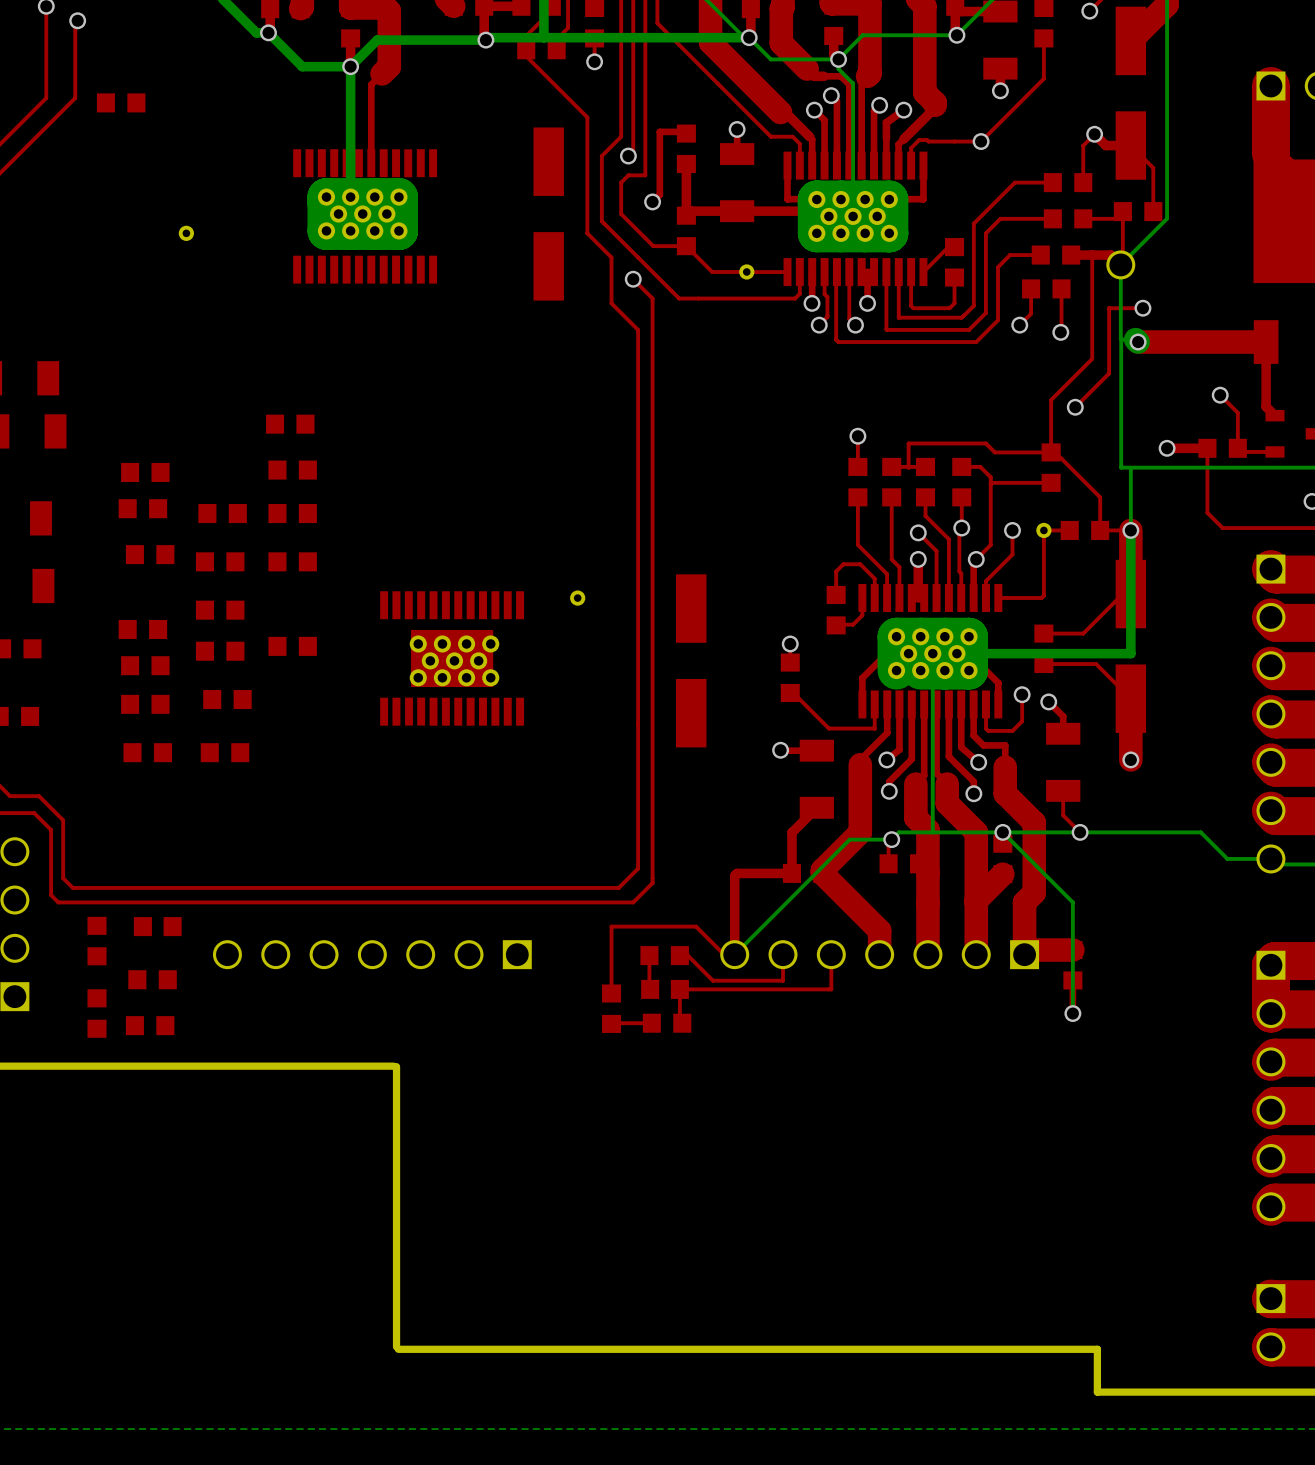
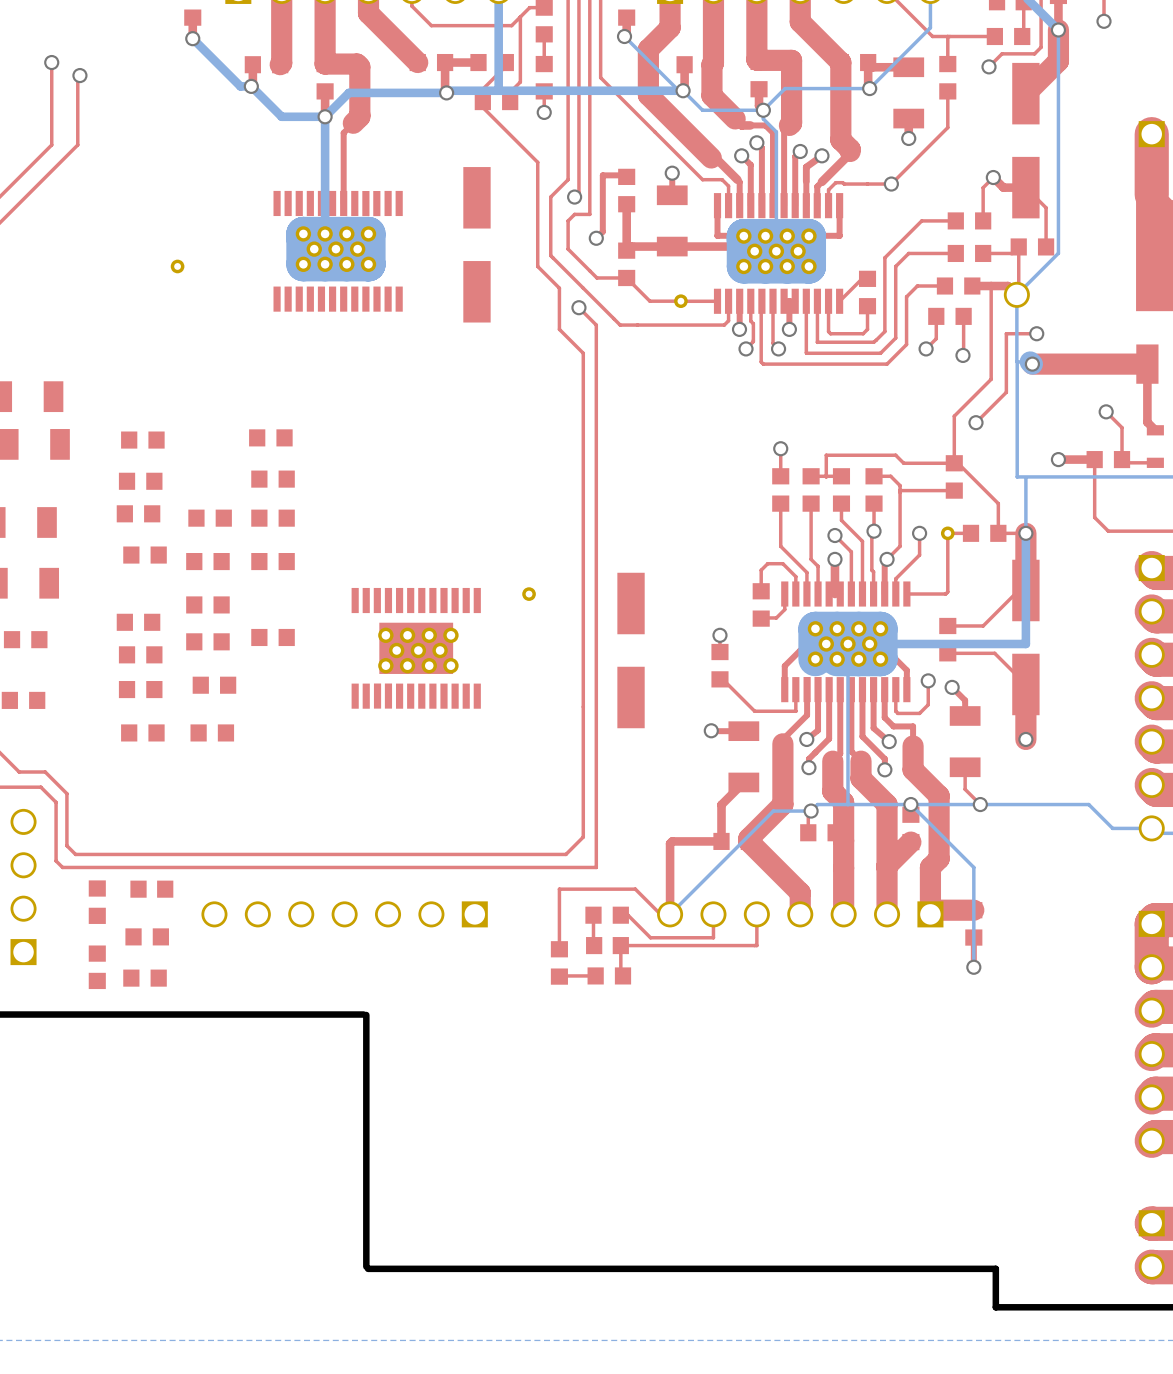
part position: (121, 102) -> (142, 440)
part position: (548, 214) -> (476, 244)
top track: (652, 883) (633, 902) -> (596, 850) (596, 867) (578, 867)

